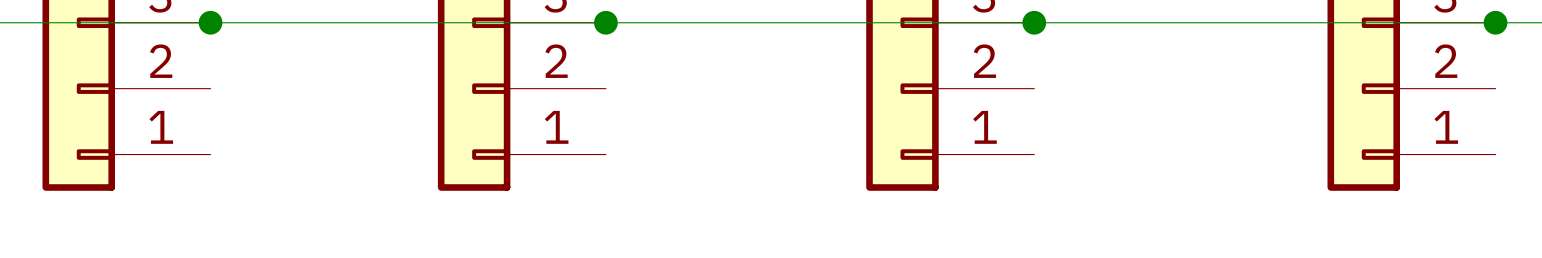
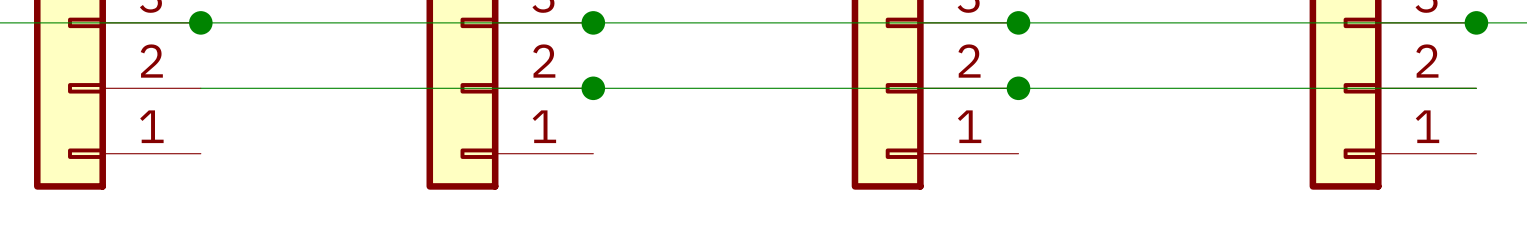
wire: none -> (200, 88) (1476, 88)
junction: none -> (593, 88)
junction: none -> (1018, 88)

